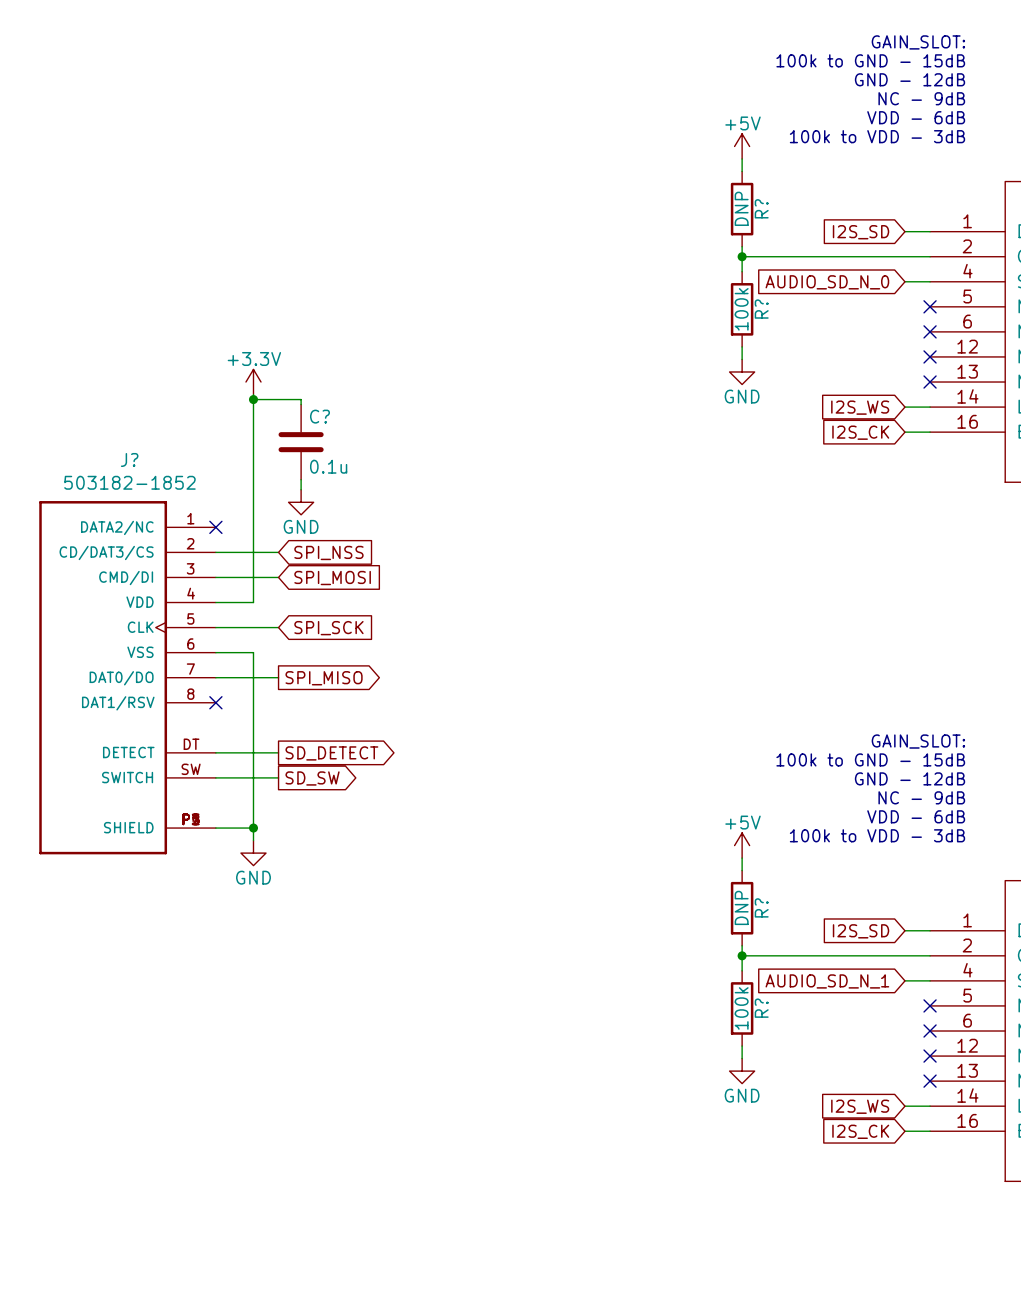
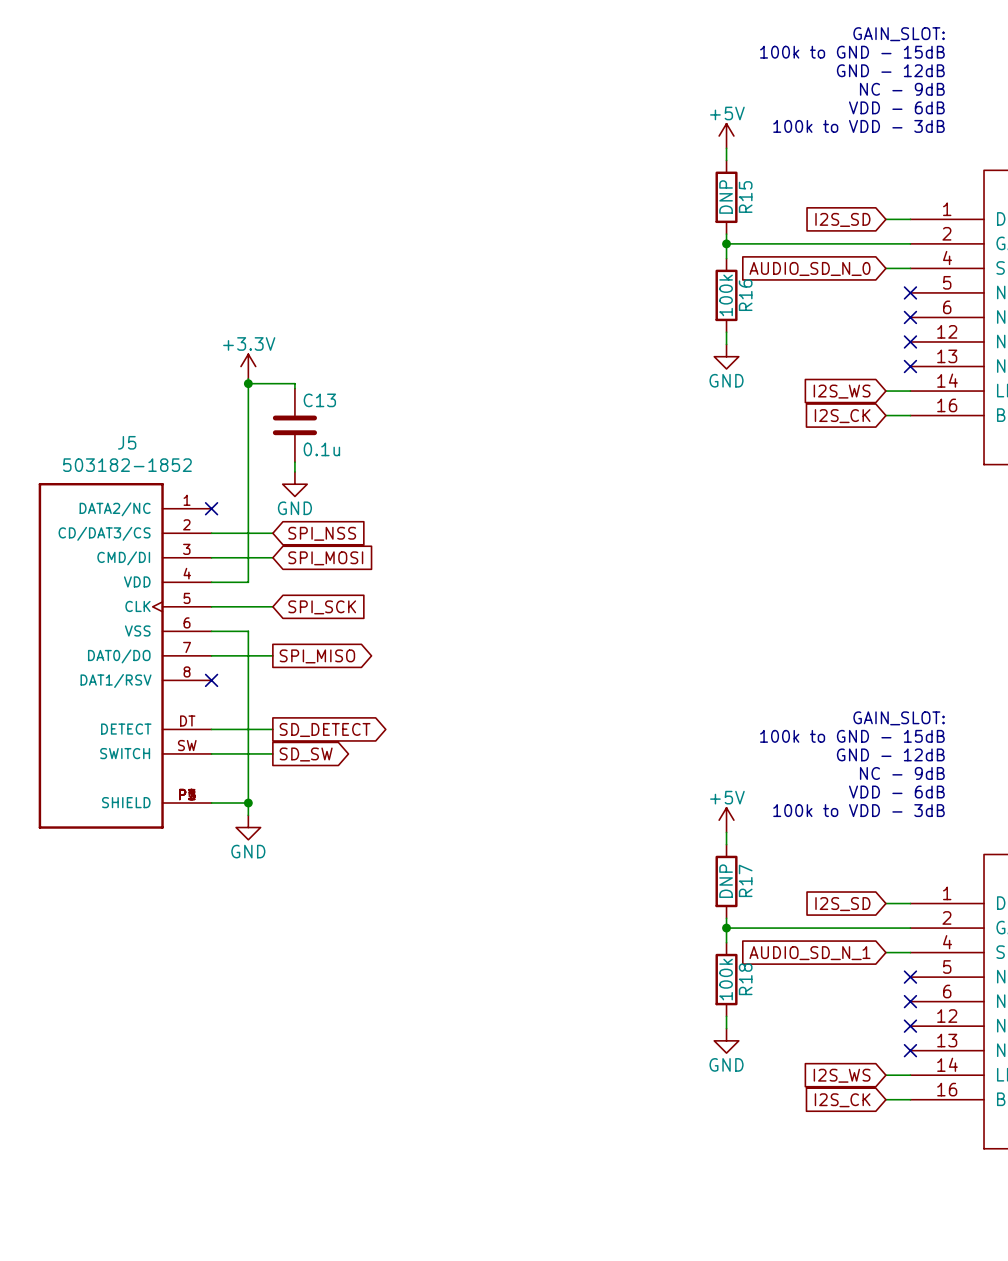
R? name: R? (761, 208) -> R15 (745, 197)
R? name: R? (761, 309) -> R16 (745, 295)
C? name: C? (319, 416) -> C13 (319, 400)
J? name: J? (129, 459) -> J5 (127, 442)
R? name: R? (761, 907) -> R17 (745, 880)
R? name: R? (761, 1008) -> R18 (745, 979)

